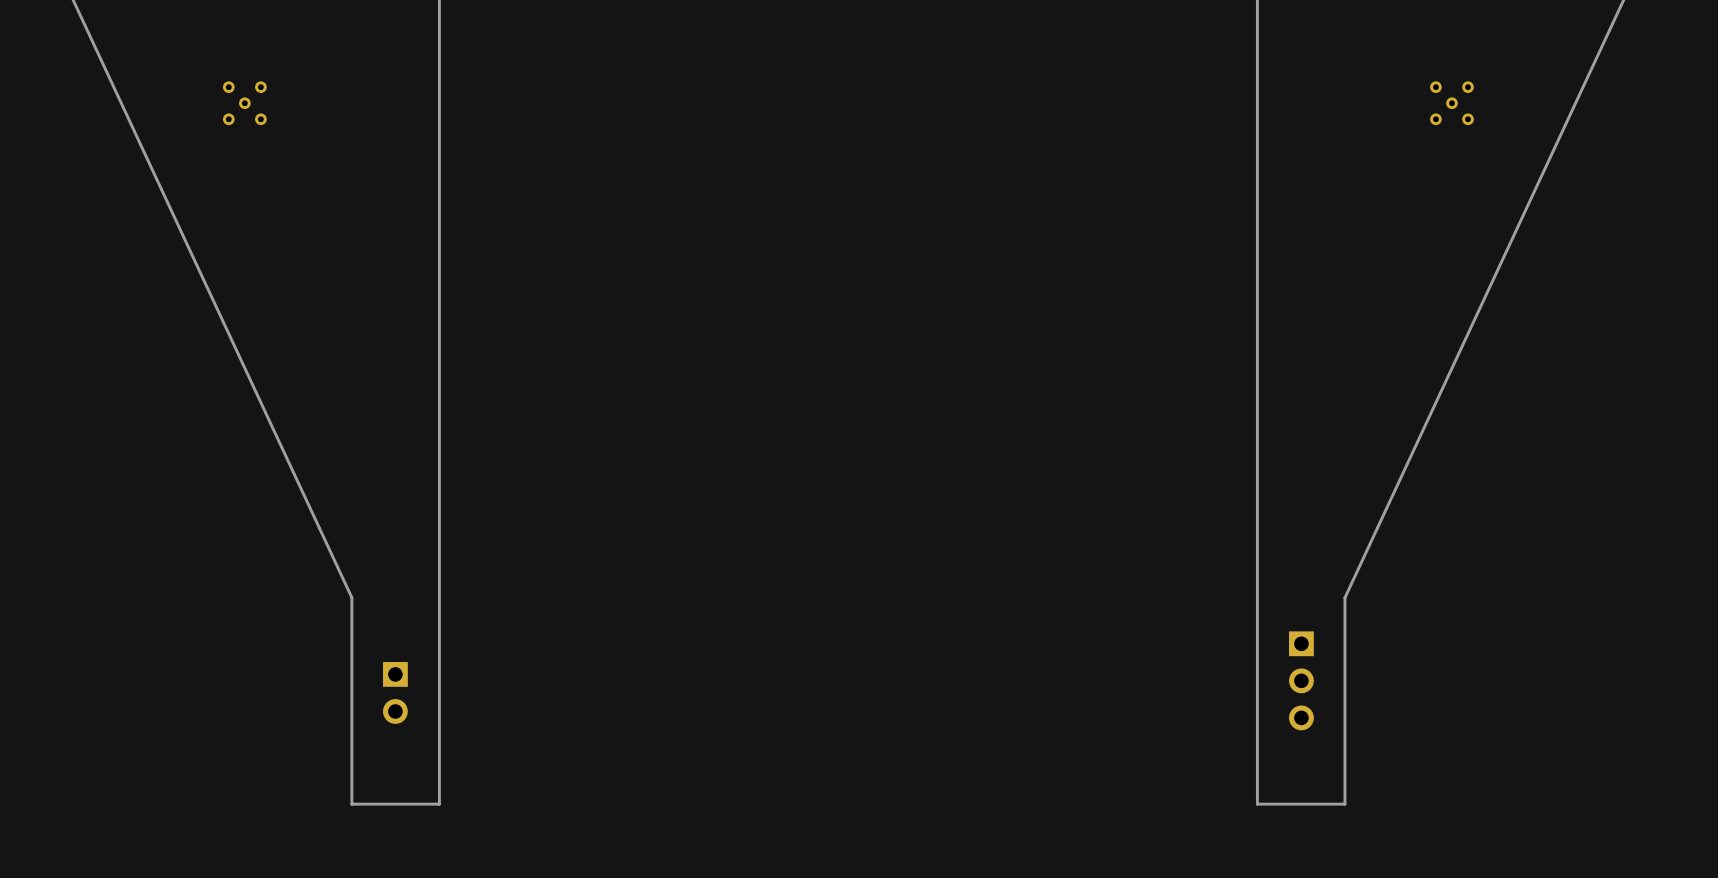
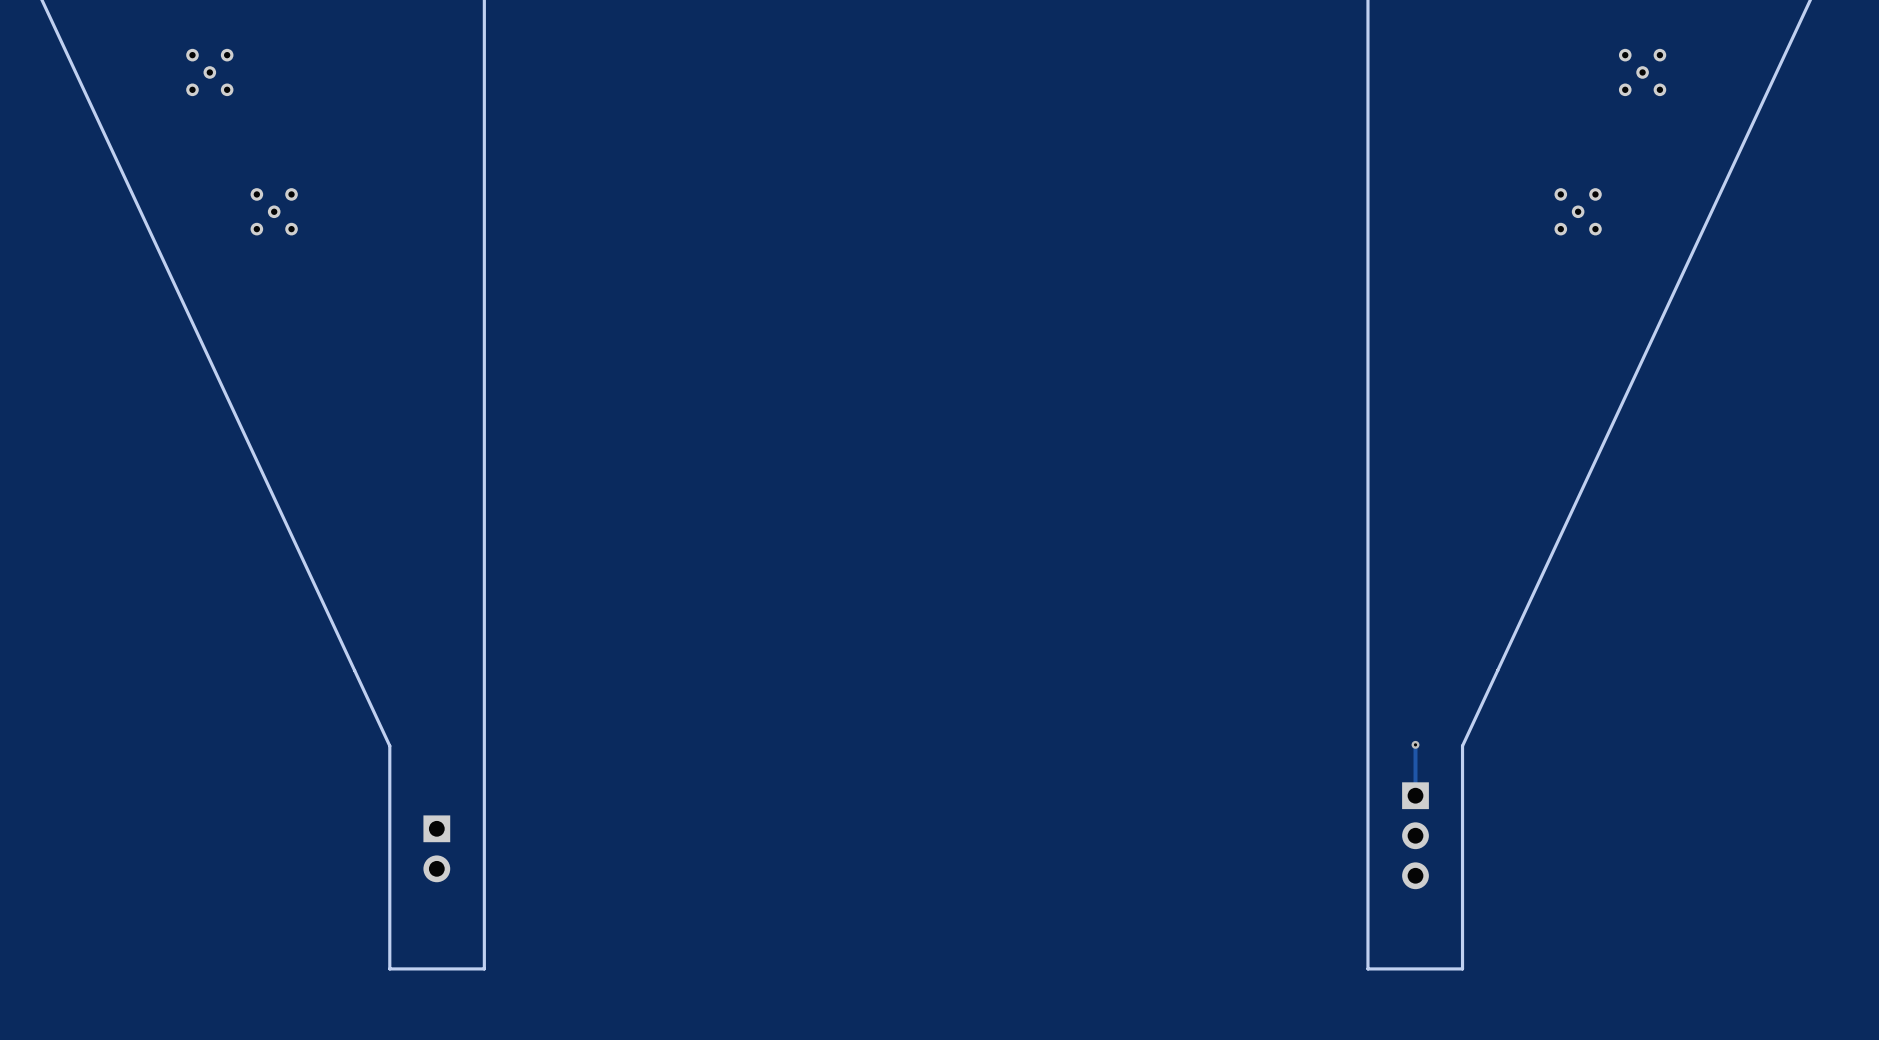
track: none -> (1415, 744) (1415, 795)
via: none -> (1415, 744)

